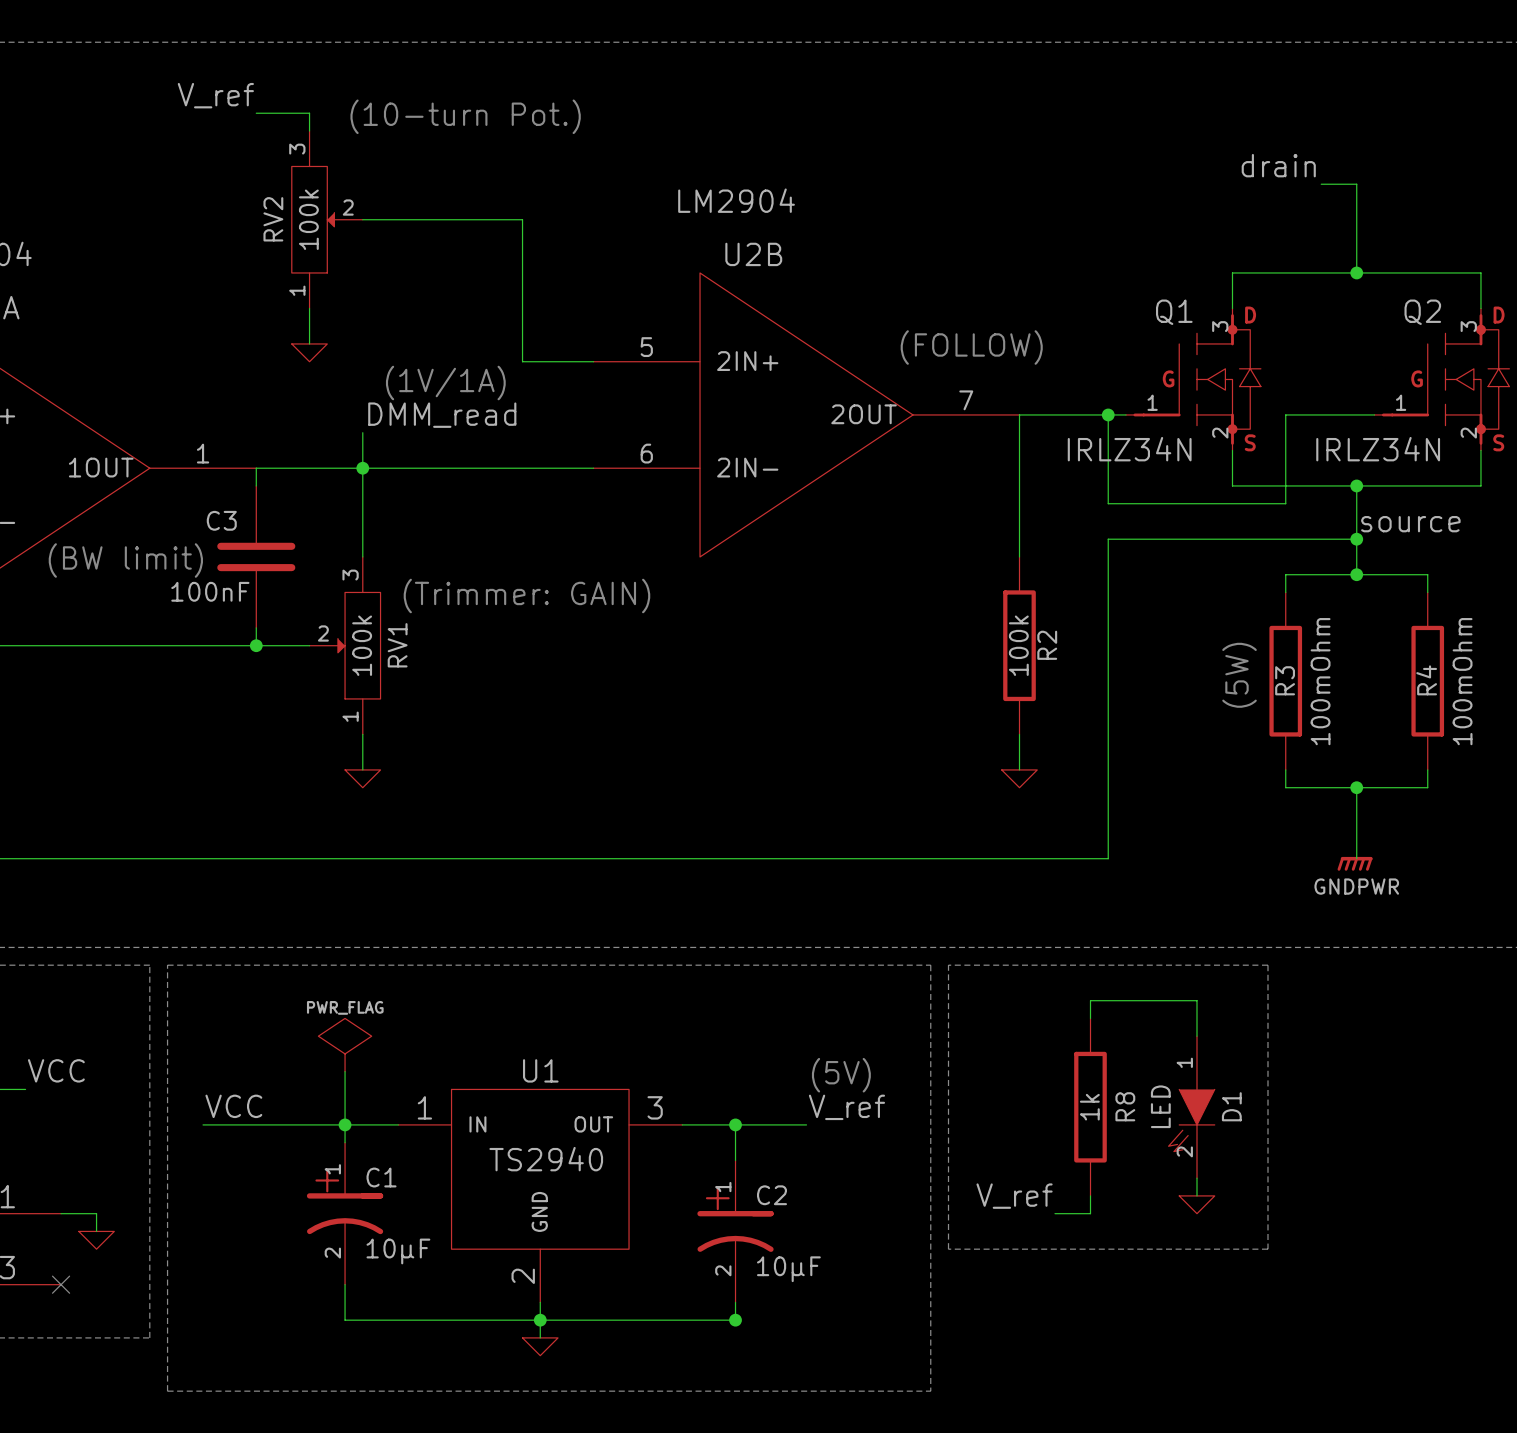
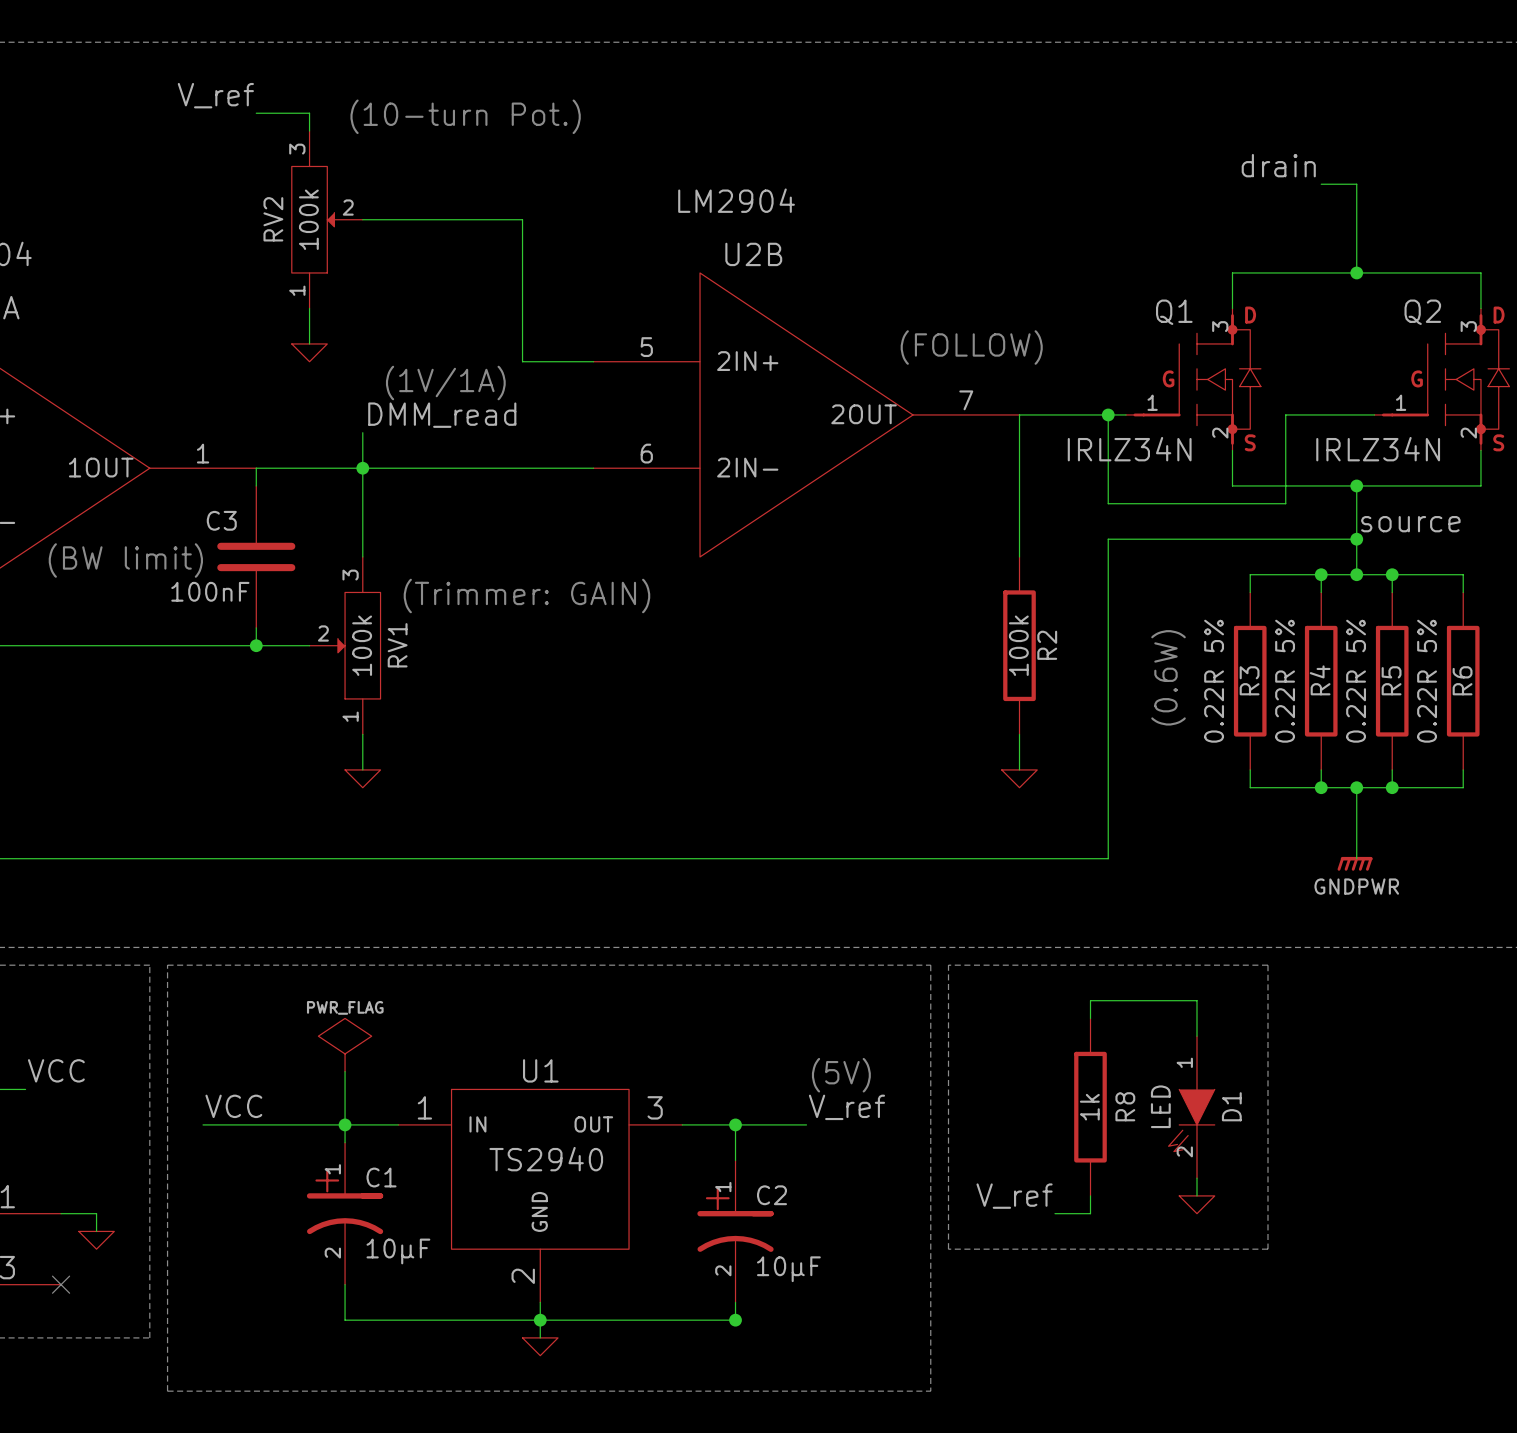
wire: (1285, 574) (1285, 592) -> (1285, 574) (1250, 574) (1250, 592)
wire: none -> (1321, 574) (1321, 592)
junction: none -> (1321, 574)
wire: none -> (1392, 574) (1392, 592)
junction: none -> (1392, 574)
wire: (1427, 574) (1427, 592) -> (1427, 574) (1463, 574) (1463, 592)
text: (5W) (1239, 675) -> none
text: none -> (0.6W) (1168, 677)
R3 position: (1285, 681) -> (1250, 681)
R3 value: 100mOhm (1320, 681) -> 0.22R 5% (1214, 681)
R5: none -> 0.22R 5% (1392, 681)
R4 position: (1427, 681) -> (1321, 681)
R4 value: 100mOhm (1462, 681) -> 0.22R 5% (1285, 681)
R6: none -> 0.22R 5% (1463, 681)
wire: (1285, 769) (1285, 787) -> (1250, 769) (1250, 787) (1285, 787)
wire: none -> (1321, 769) (1321, 787)
wire: none -> (1392, 769) (1392, 787)
wire: (1427, 769) (1427, 787) -> (1463, 769) (1463, 787) (1427, 787)
junction: none -> (1321, 787)
junction: none -> (1392, 787)

